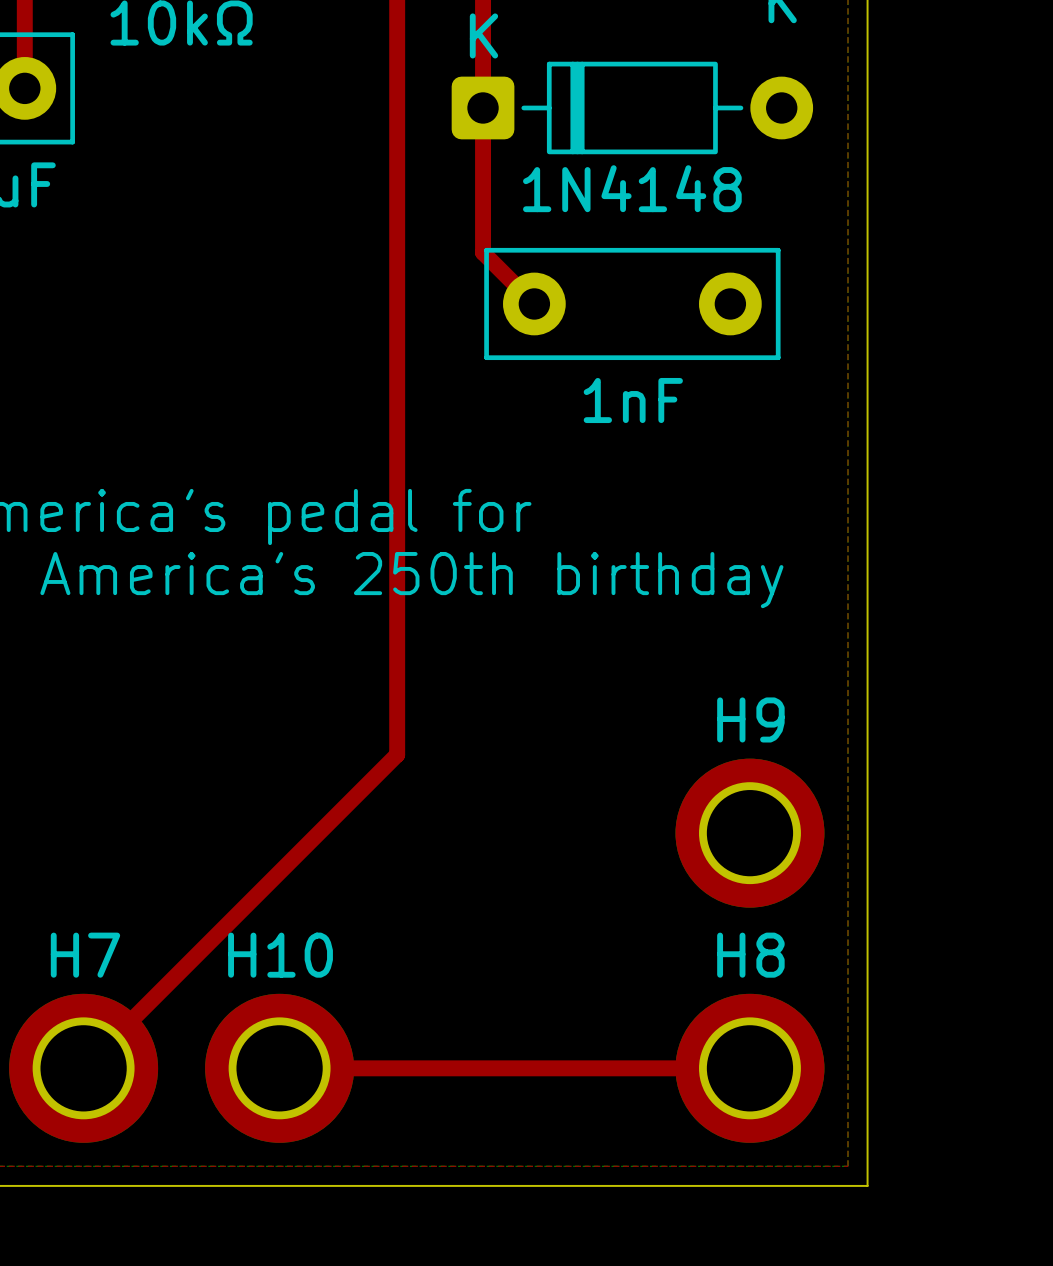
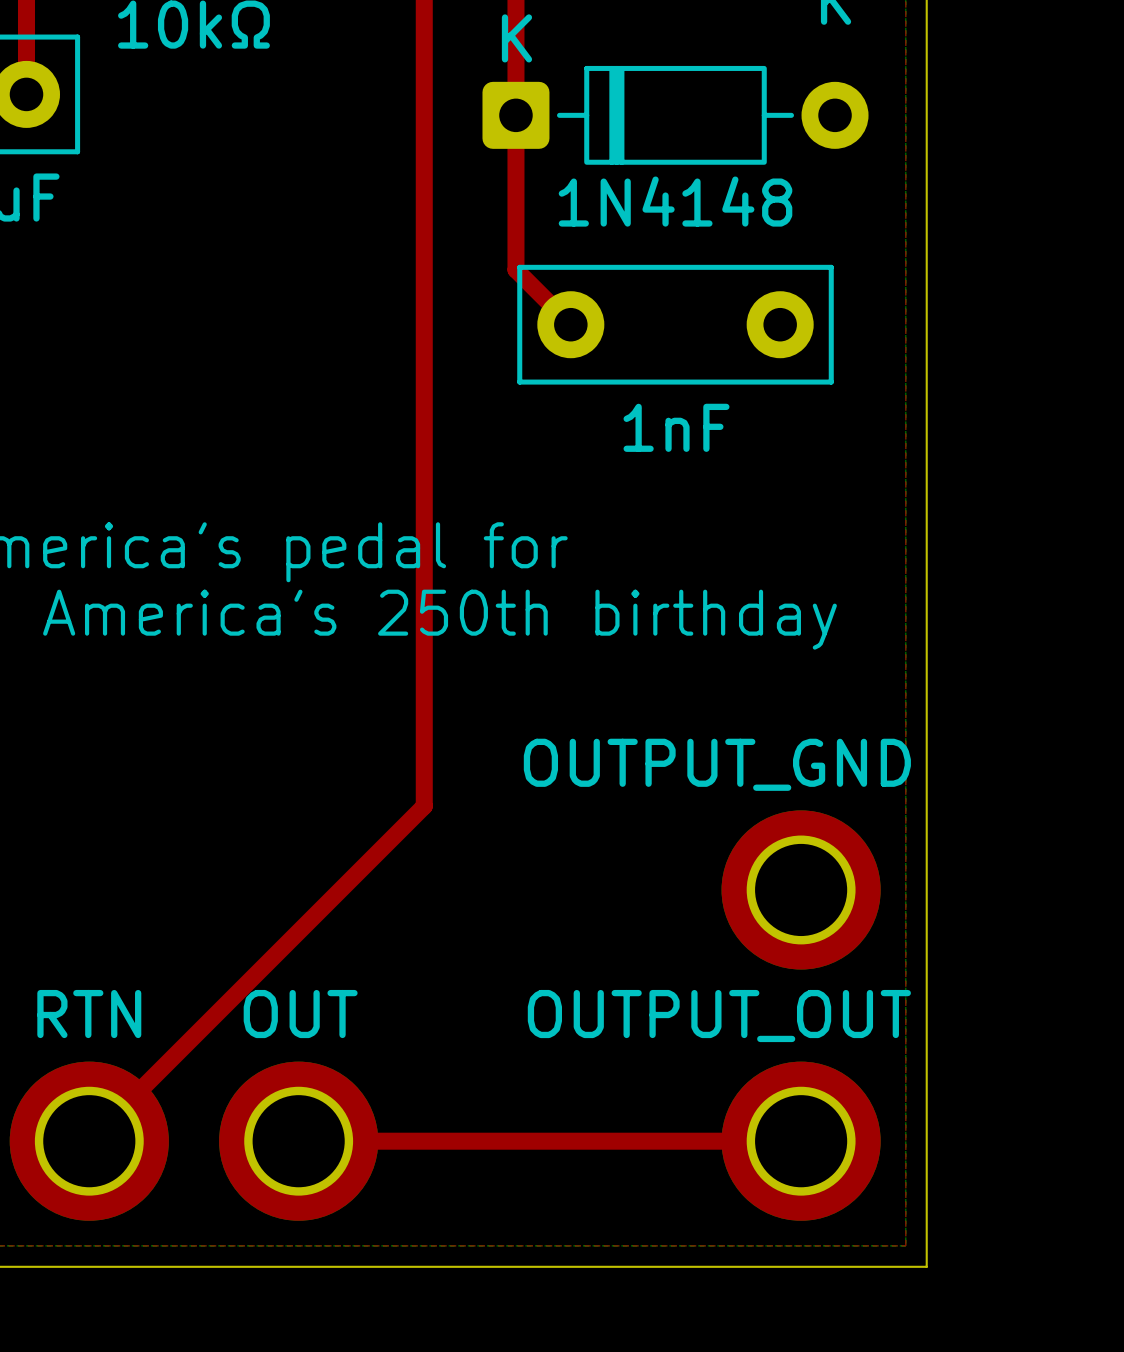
H9 value: none -> OUTPUT_GND (717, 764)
H9 name: H9 (750, 719) -> none
H7 value: none -> RTN (89, 1014)
H10 value: none -> OUT (300, 1014)
H8 value: none -> OUTPUT_OUT (719, 1016)
H7 name: H7 (85, 955) -> none
H10 name: H10 (280, 955) -> none
H8 name: H8 (750, 955) -> none

